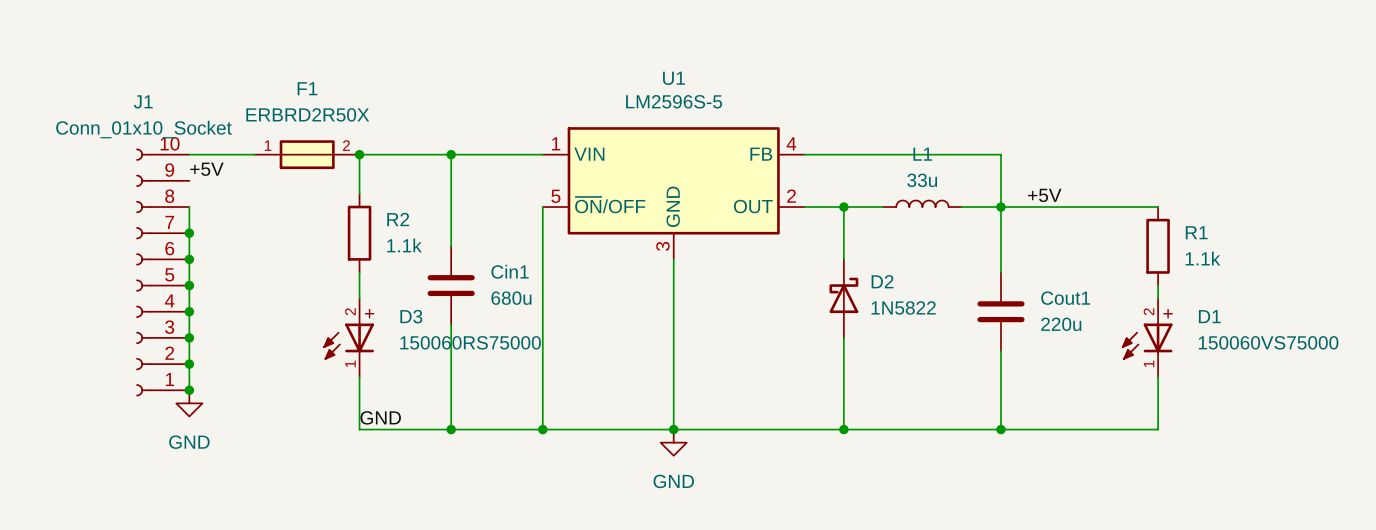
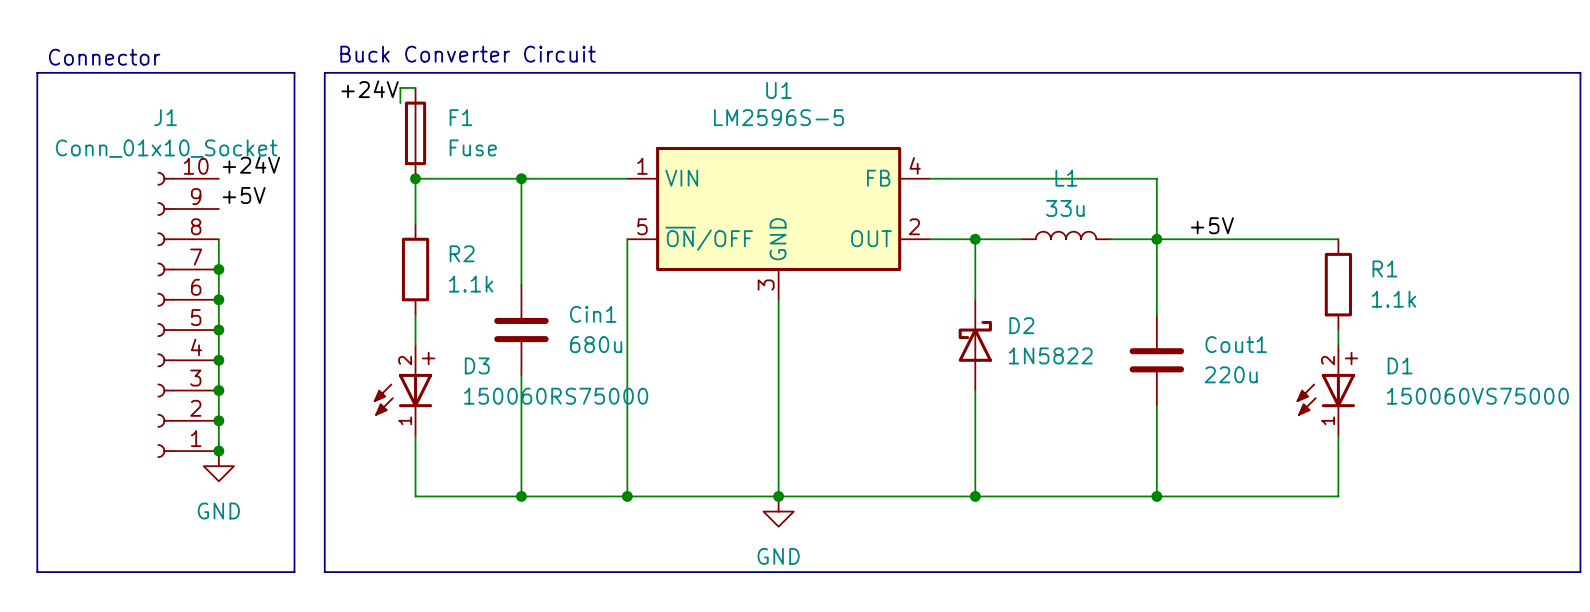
text: none -> Buck Converter Circuit (468, 54)
text: none -> Connector (104, 57)
line: none -> (37, 72) (294, 72) (294, 572) (37, 572) (37, 72)
line: none -> (324, 72) (1580, 72) (1580, 572) (324, 572) (324, 72)
wire: none -> (415, 87) (400, 87) (400, 103)
label: none -> +24V (370, 89)
F1 name position: F1 (307, 88) -> F1 (461, 117)
F1 value: ERBRD2R50X (307, 114) -> Fuse (473, 147)
F1 symbol: [254, 140, 360, 170] -> [404, 87, 427, 179]
label: none -> +24V (251, 164)
wire: (189, 154) (254, 154) -> none
label: GND (380, 417) -> none

